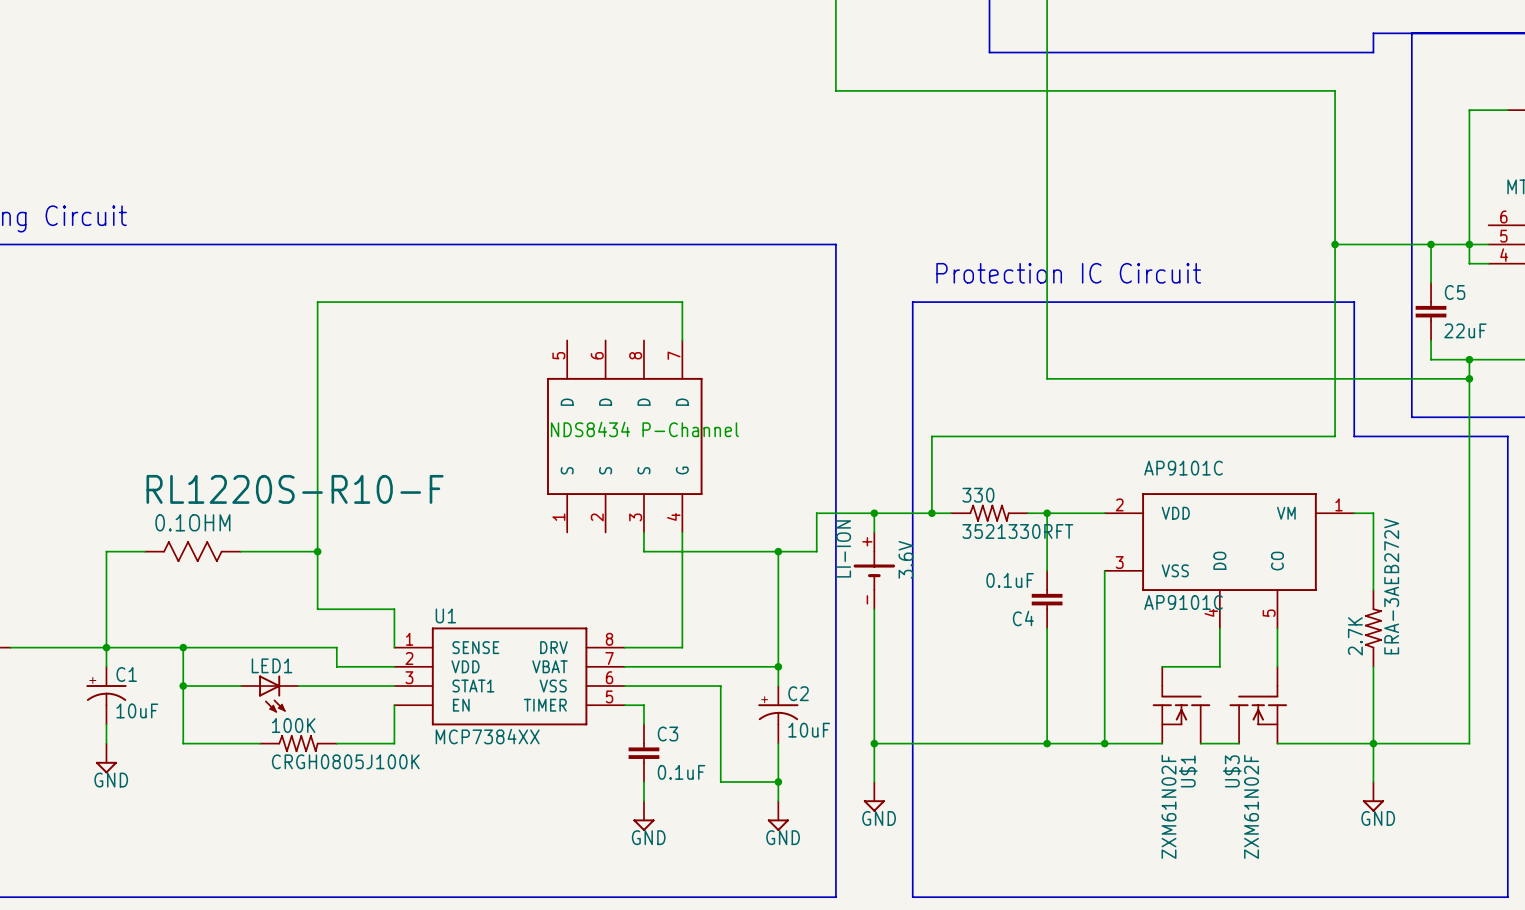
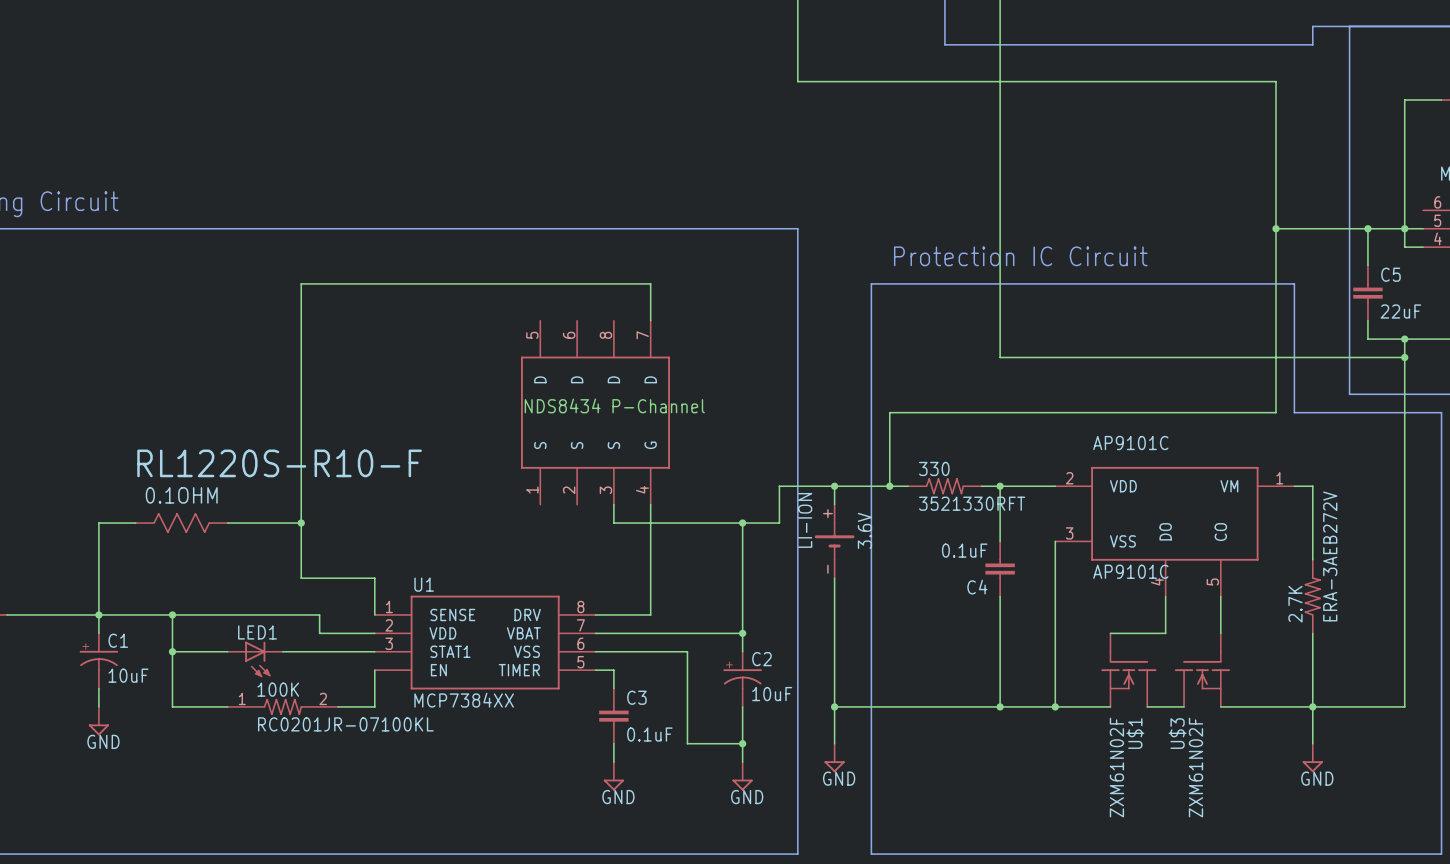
100K symbol: [260, 735, 337, 753] -> [227, 698, 339, 716]
100K value: CRGH0805J100K (345, 761) -> RC0201JR-07100KL (345, 724)

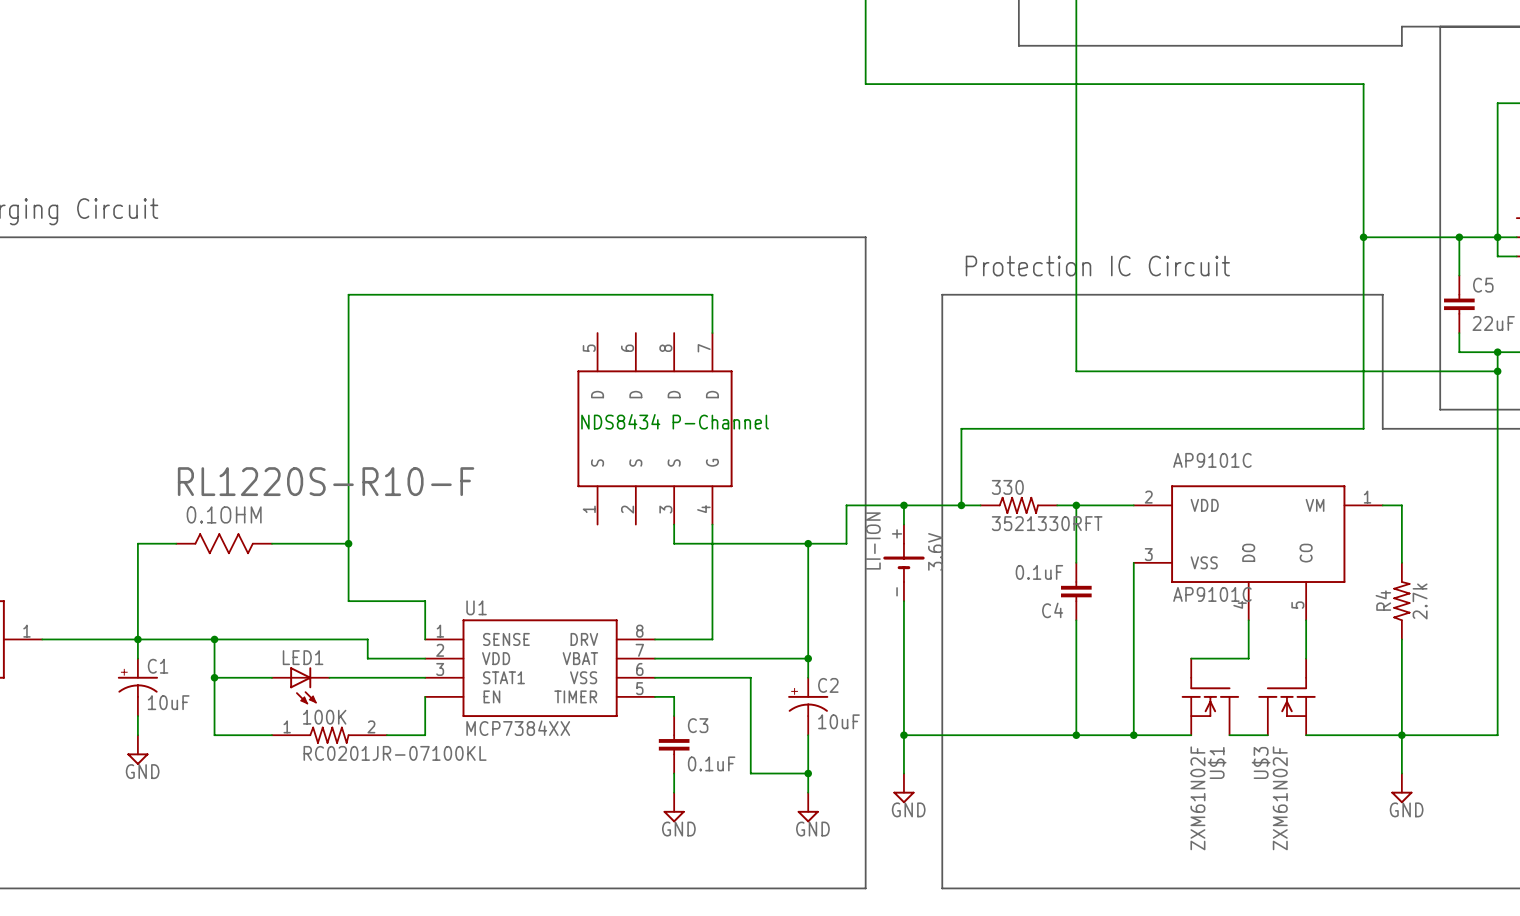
R4: none -> 2.7k (1401, 601)
2.7K: ERA-3AEB272V (1312, 596) -> none

